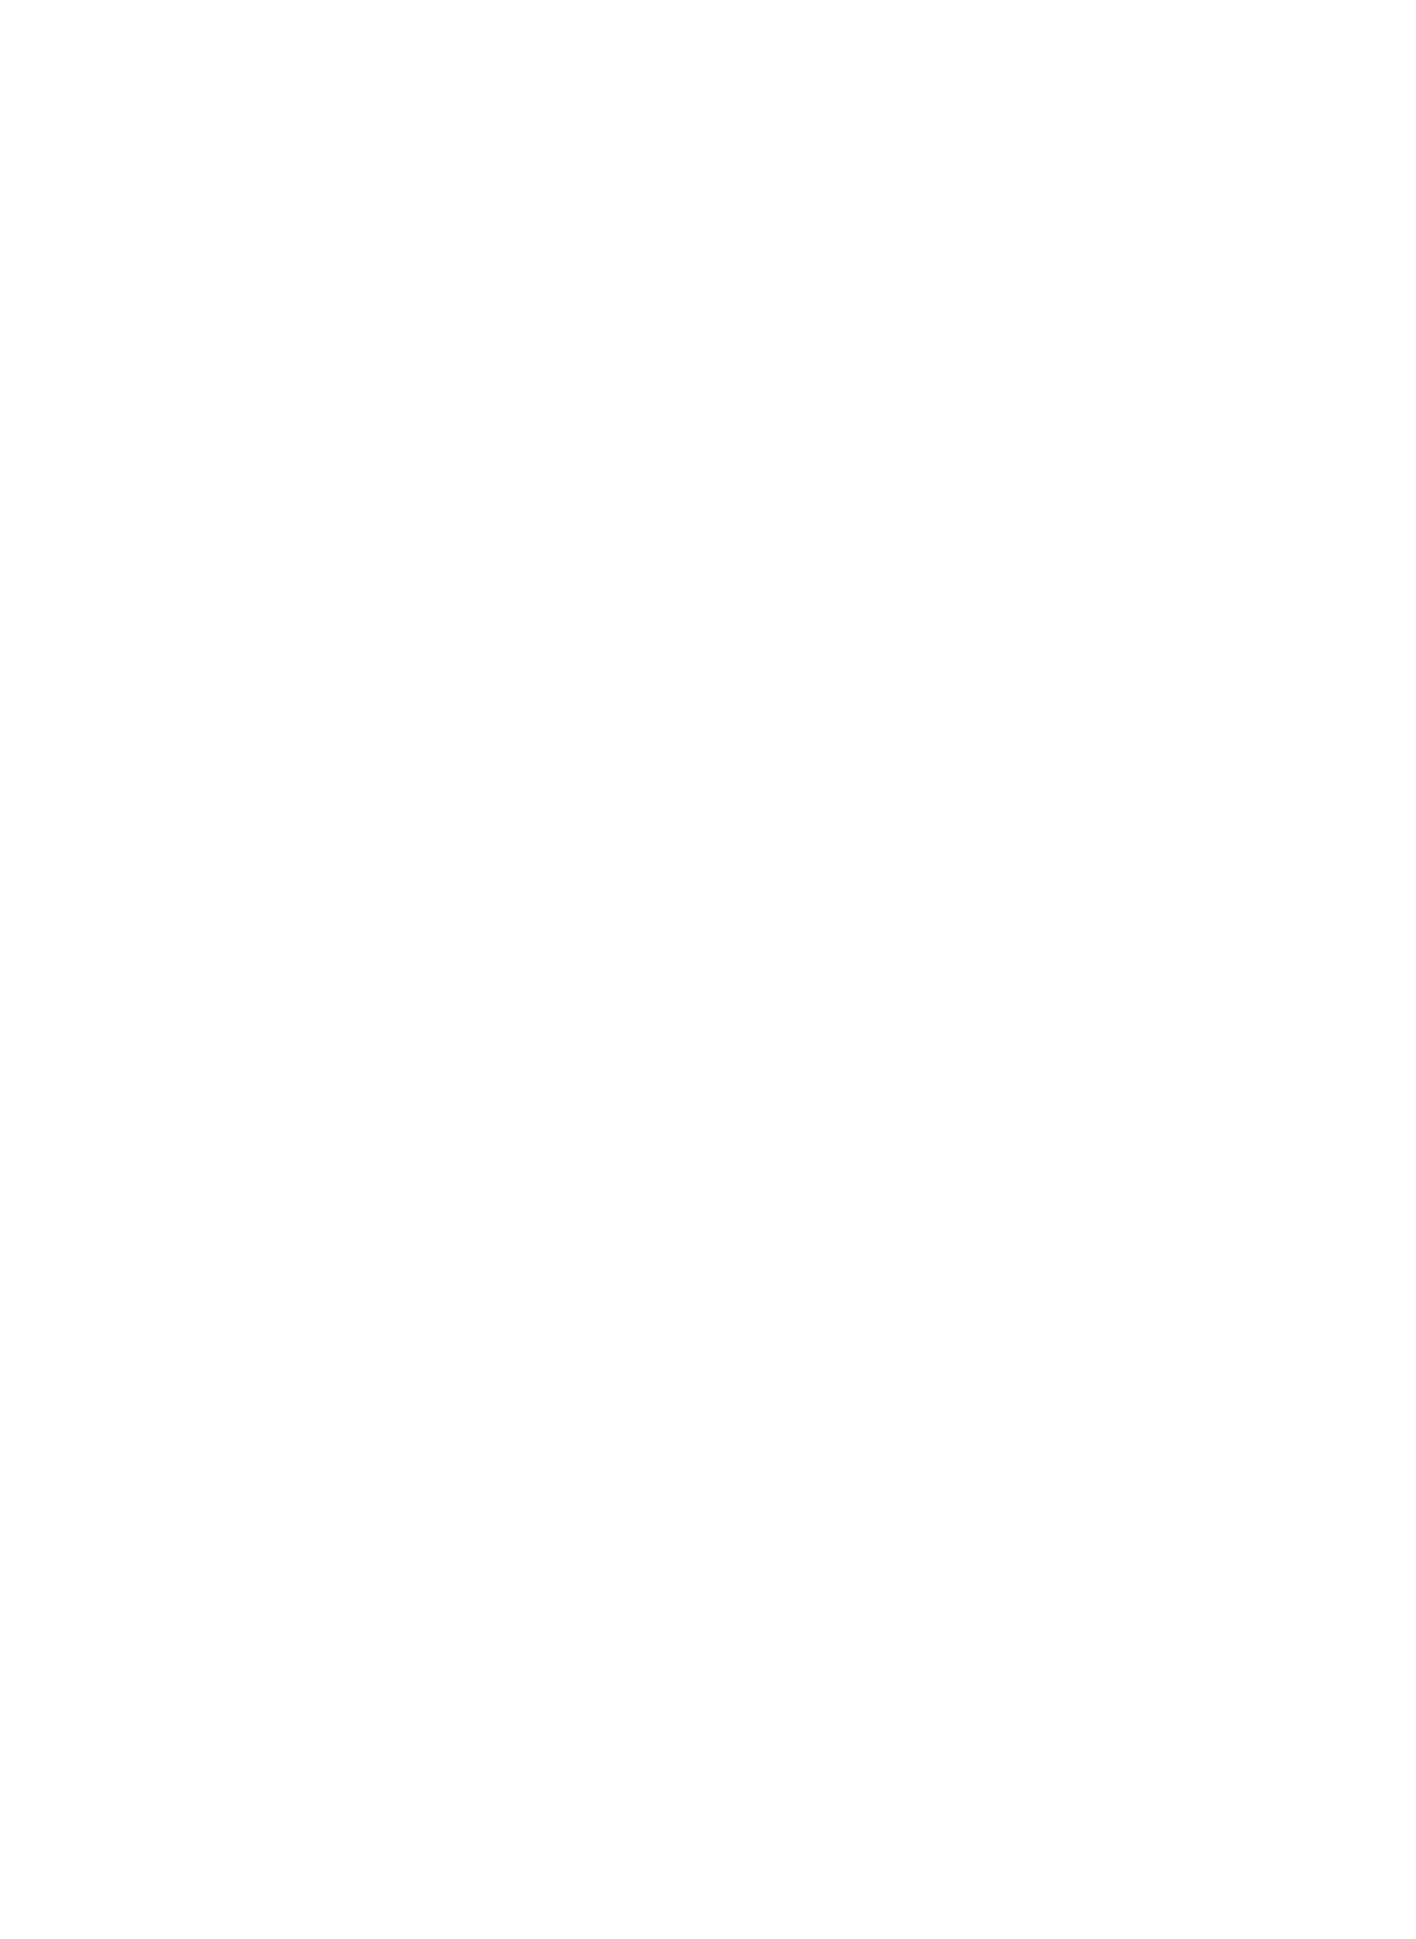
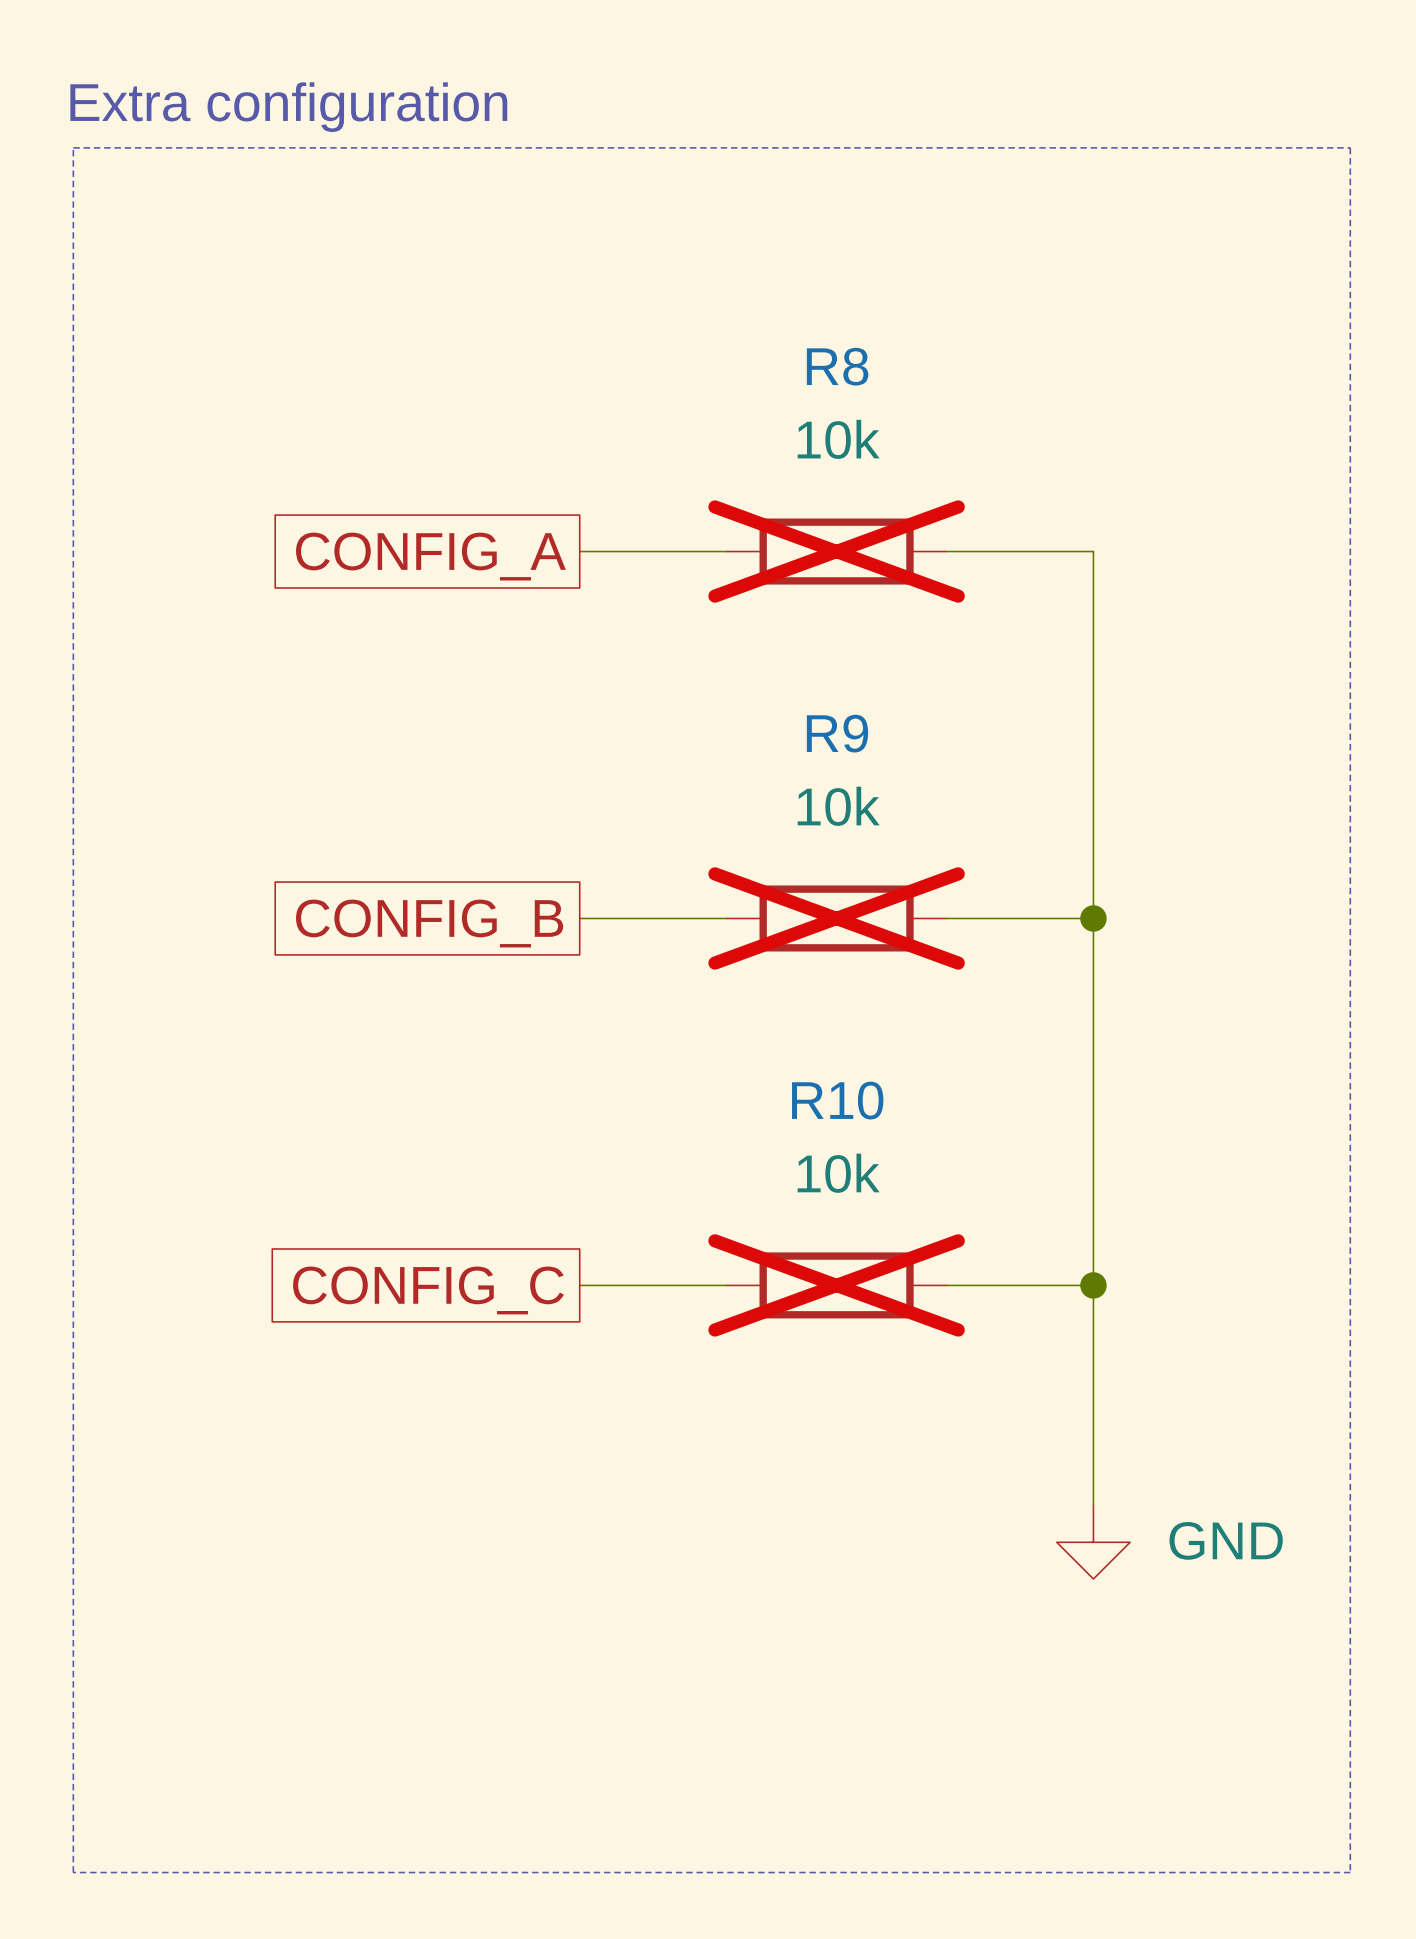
text: none -> Extra configuration (288, 107)
line: none -> (73, 147) (1350, 147) (1350, 1872) (73, 1872) (73, 147)
wire: none -> (579, 551) (726, 551)
R8: none -> 10k (836, 551)
wire: none -> (946, 551) (1093, 551) (1093, 1505)
global label: none -> CONFIG_A (430, 556)
wire: none -> (579, 918) (726, 918)
R9: none -> 10k (836, 918)
wire: none -> (946, 918) (1093, 918)
junction: none -> (1093, 918)
global label: none -> CONFIG_B (429, 923)
wire: none -> (579, 1285) (726, 1285)
R10: none -> 10k (836, 1285)
wire: none -> (946, 1285) (1093, 1285)
junction: none -> (1093, 1285)
global label: none -> CONFIG_C (428, 1290)
power symbol: none -> GND (1093, 1542)

